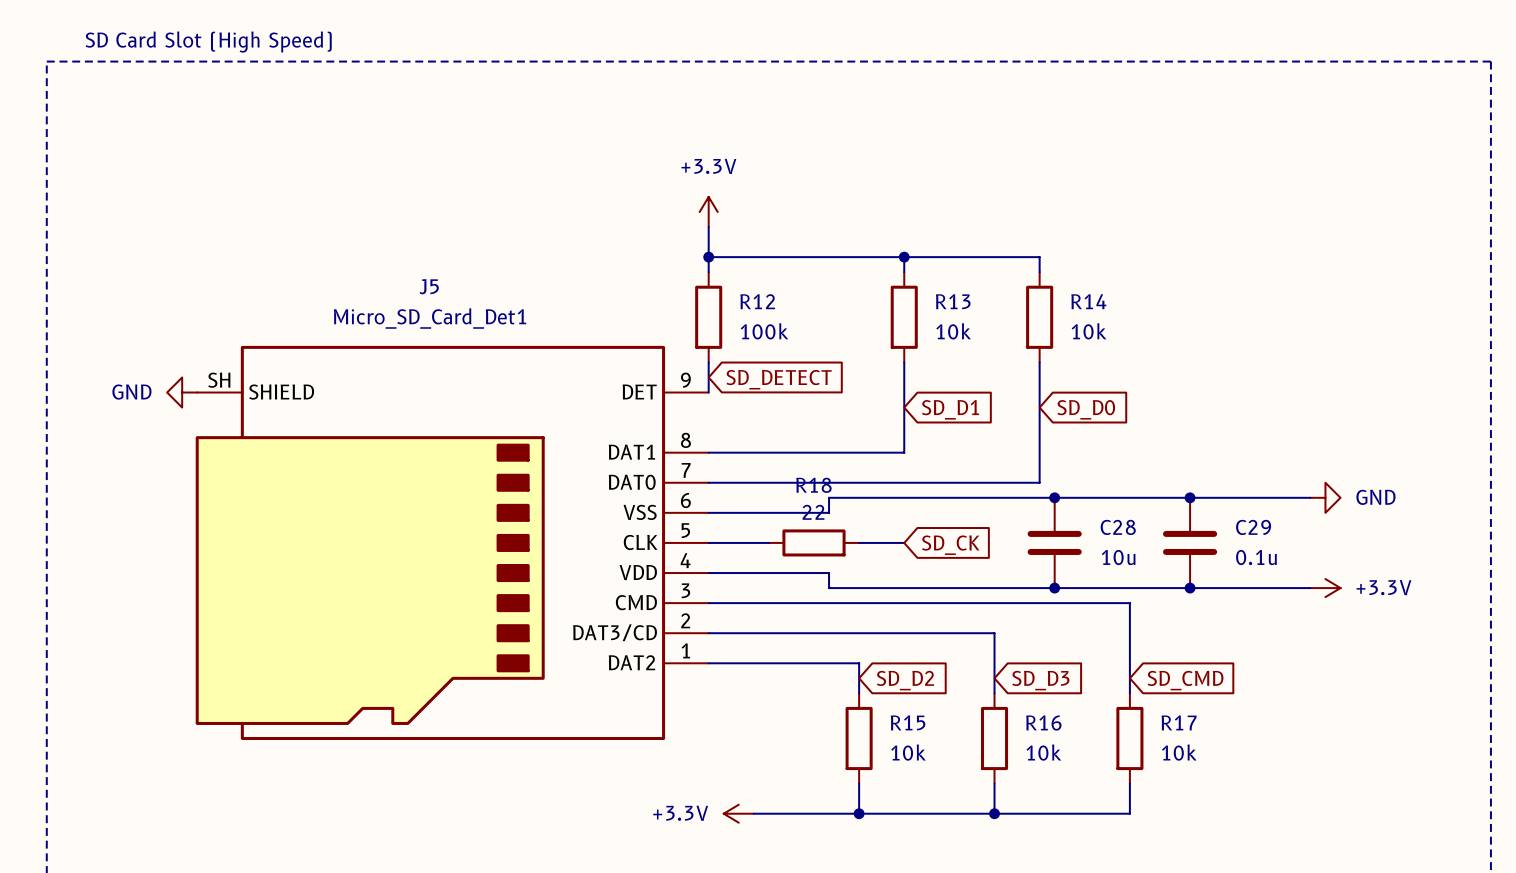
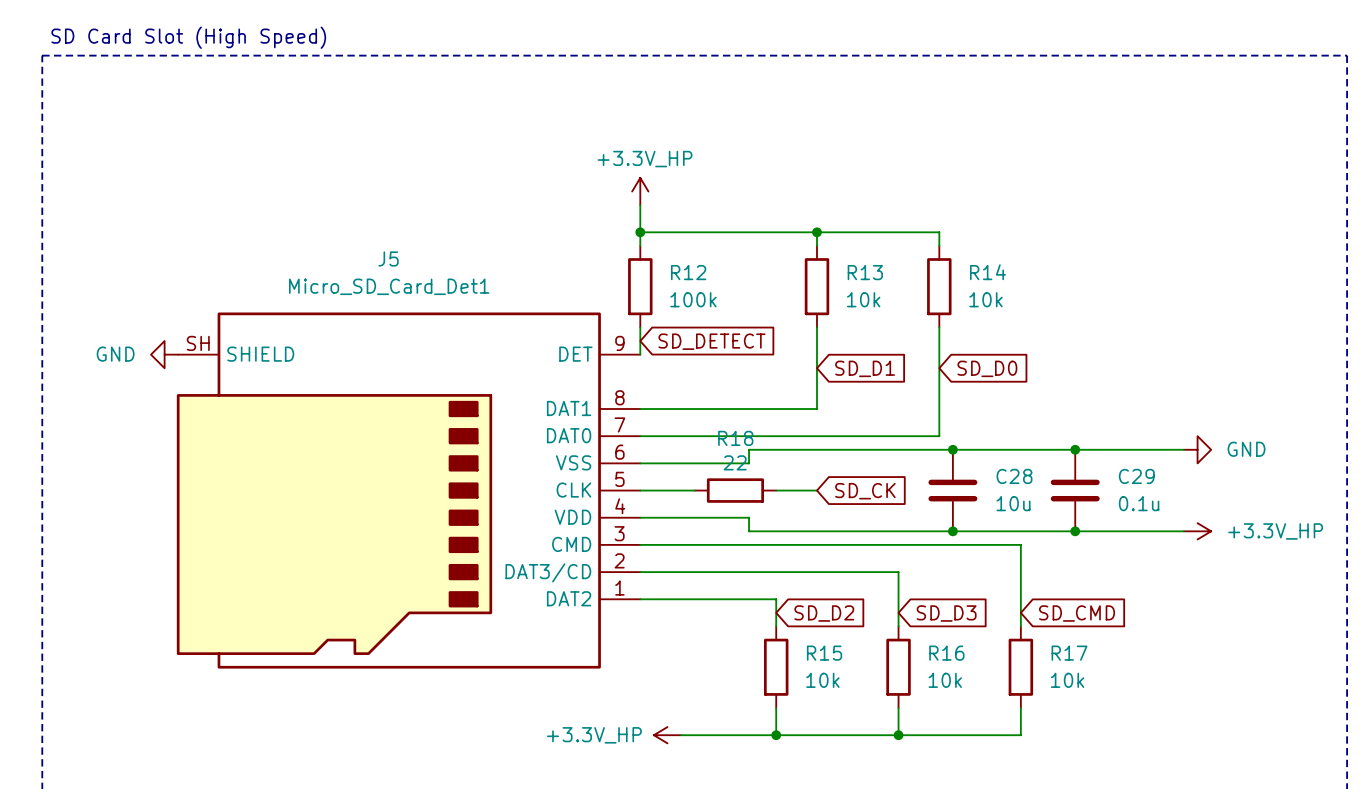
power symbol: +3.3V (708, 211) -> +3.3V_HP (640, 191)
power symbol: +3.3V (1325, 588) -> +3.3V_HP (1197, 531)
power symbol: +3.3V (738, 813) -> +3.3V_HP (667, 735)

